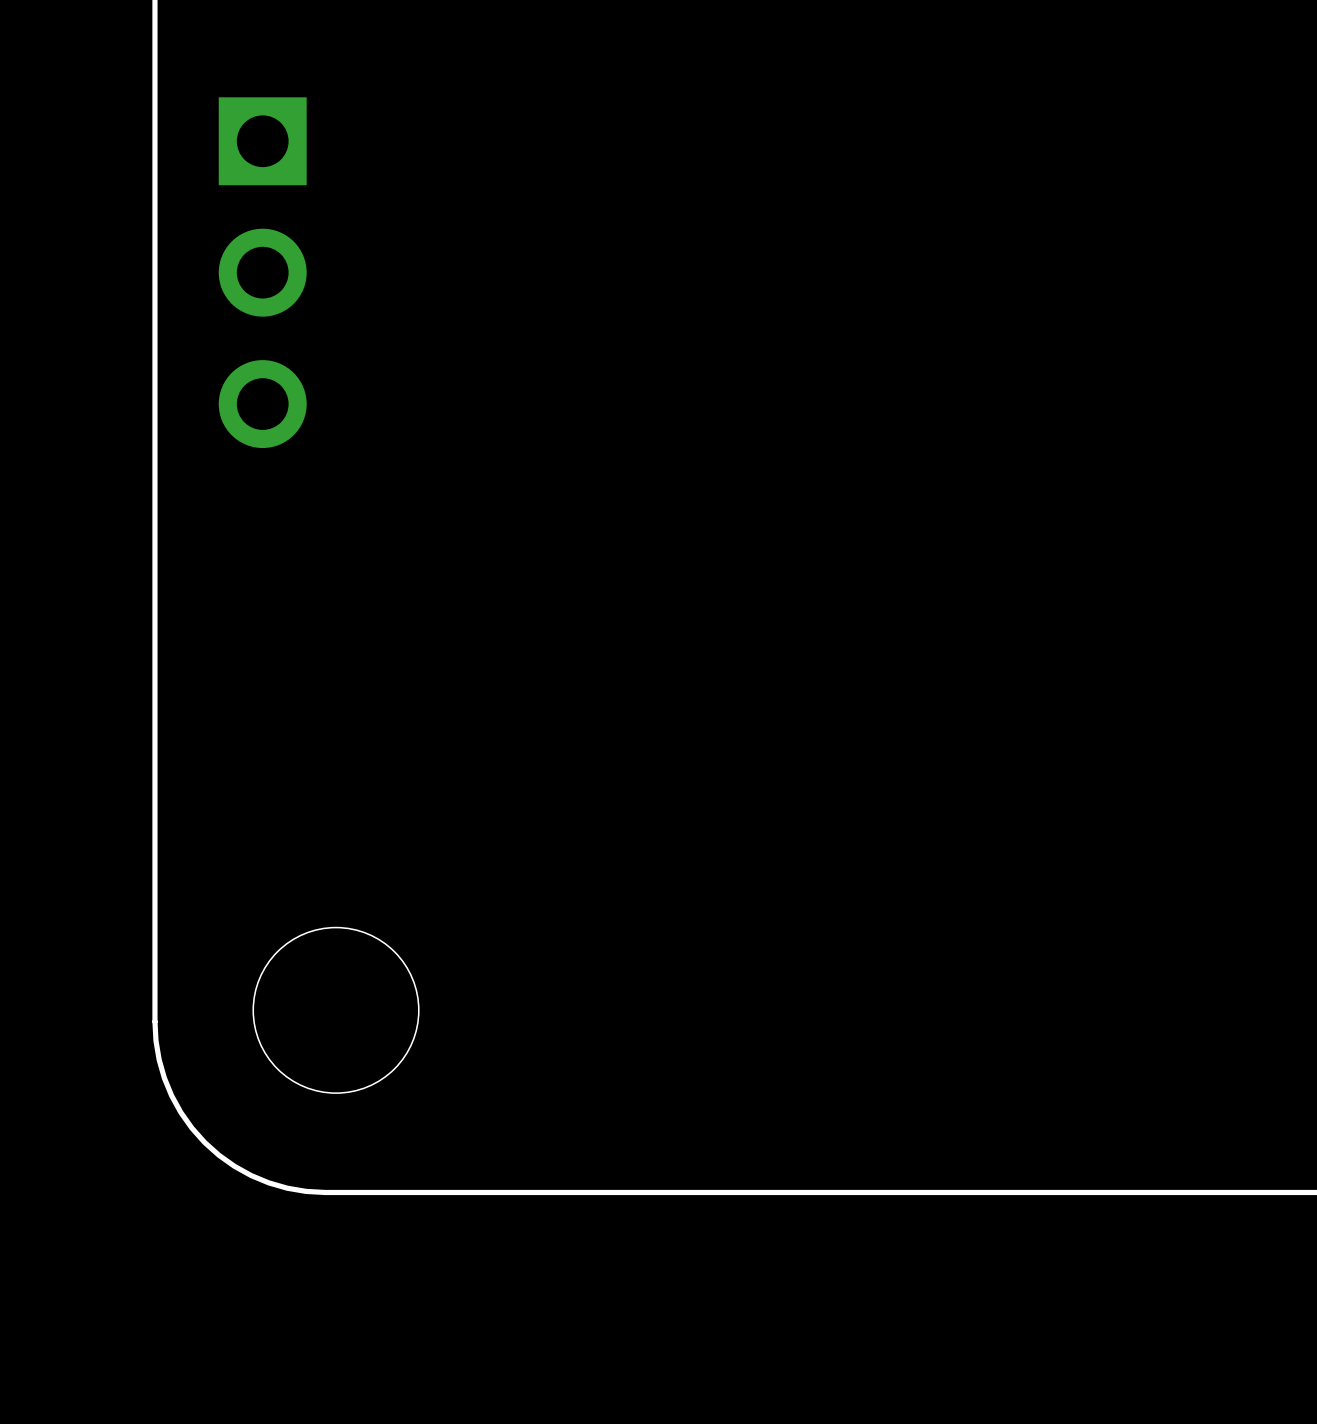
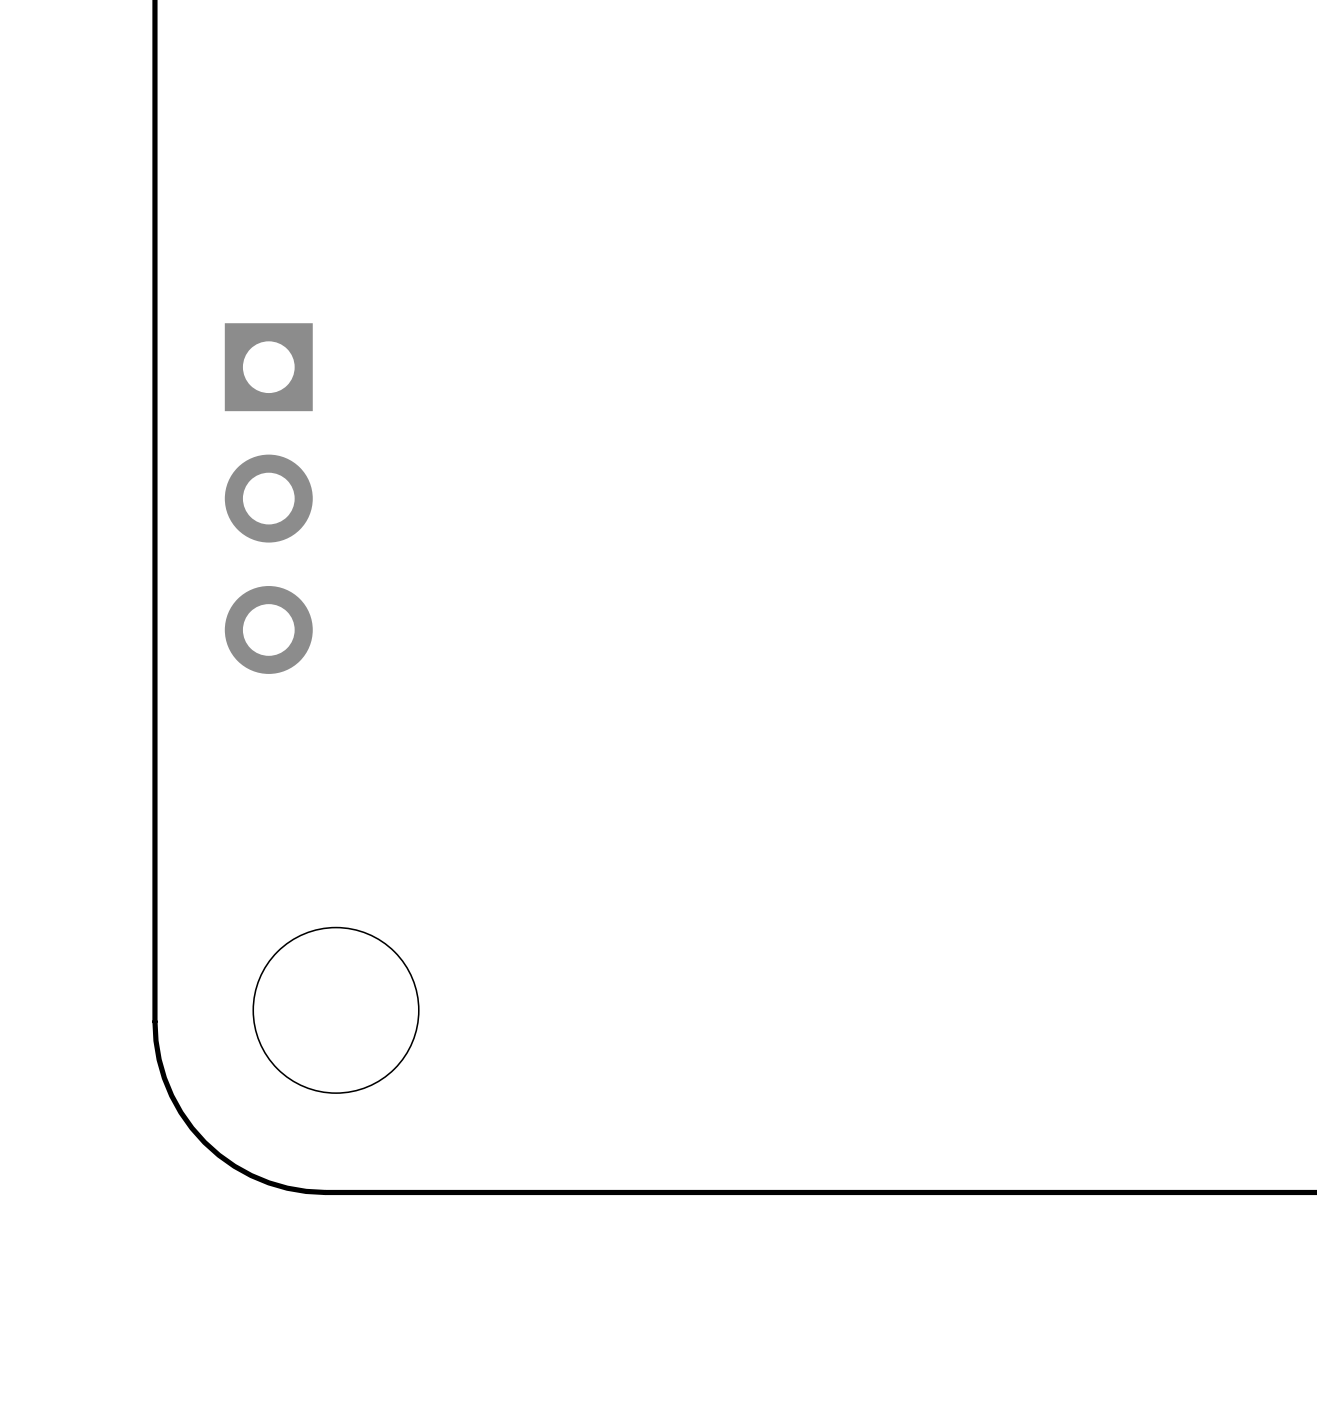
part position: (262, 272) -> (268, 498)

